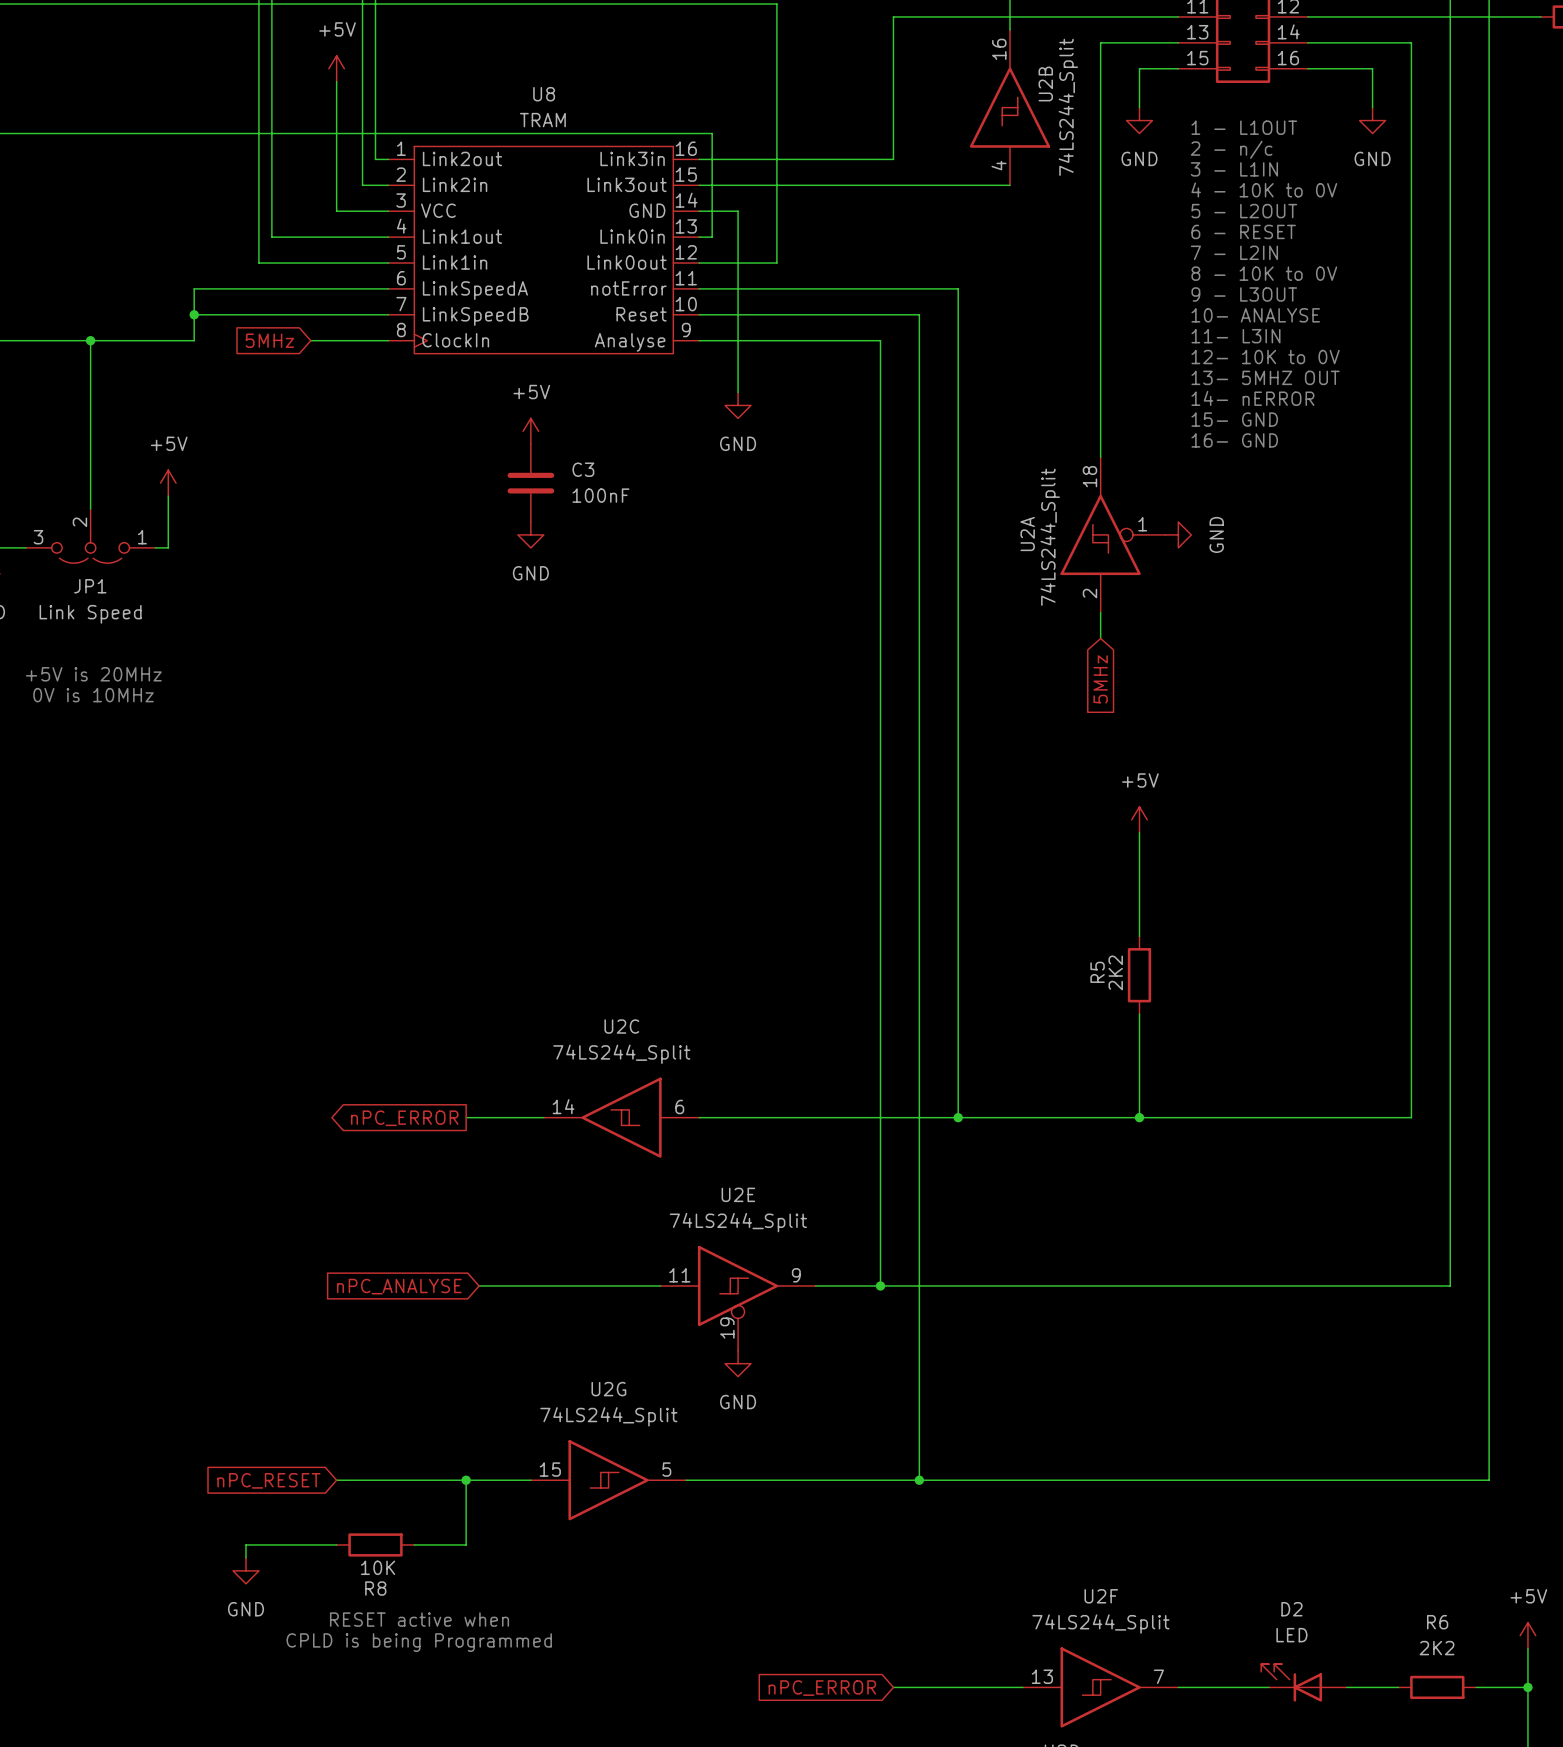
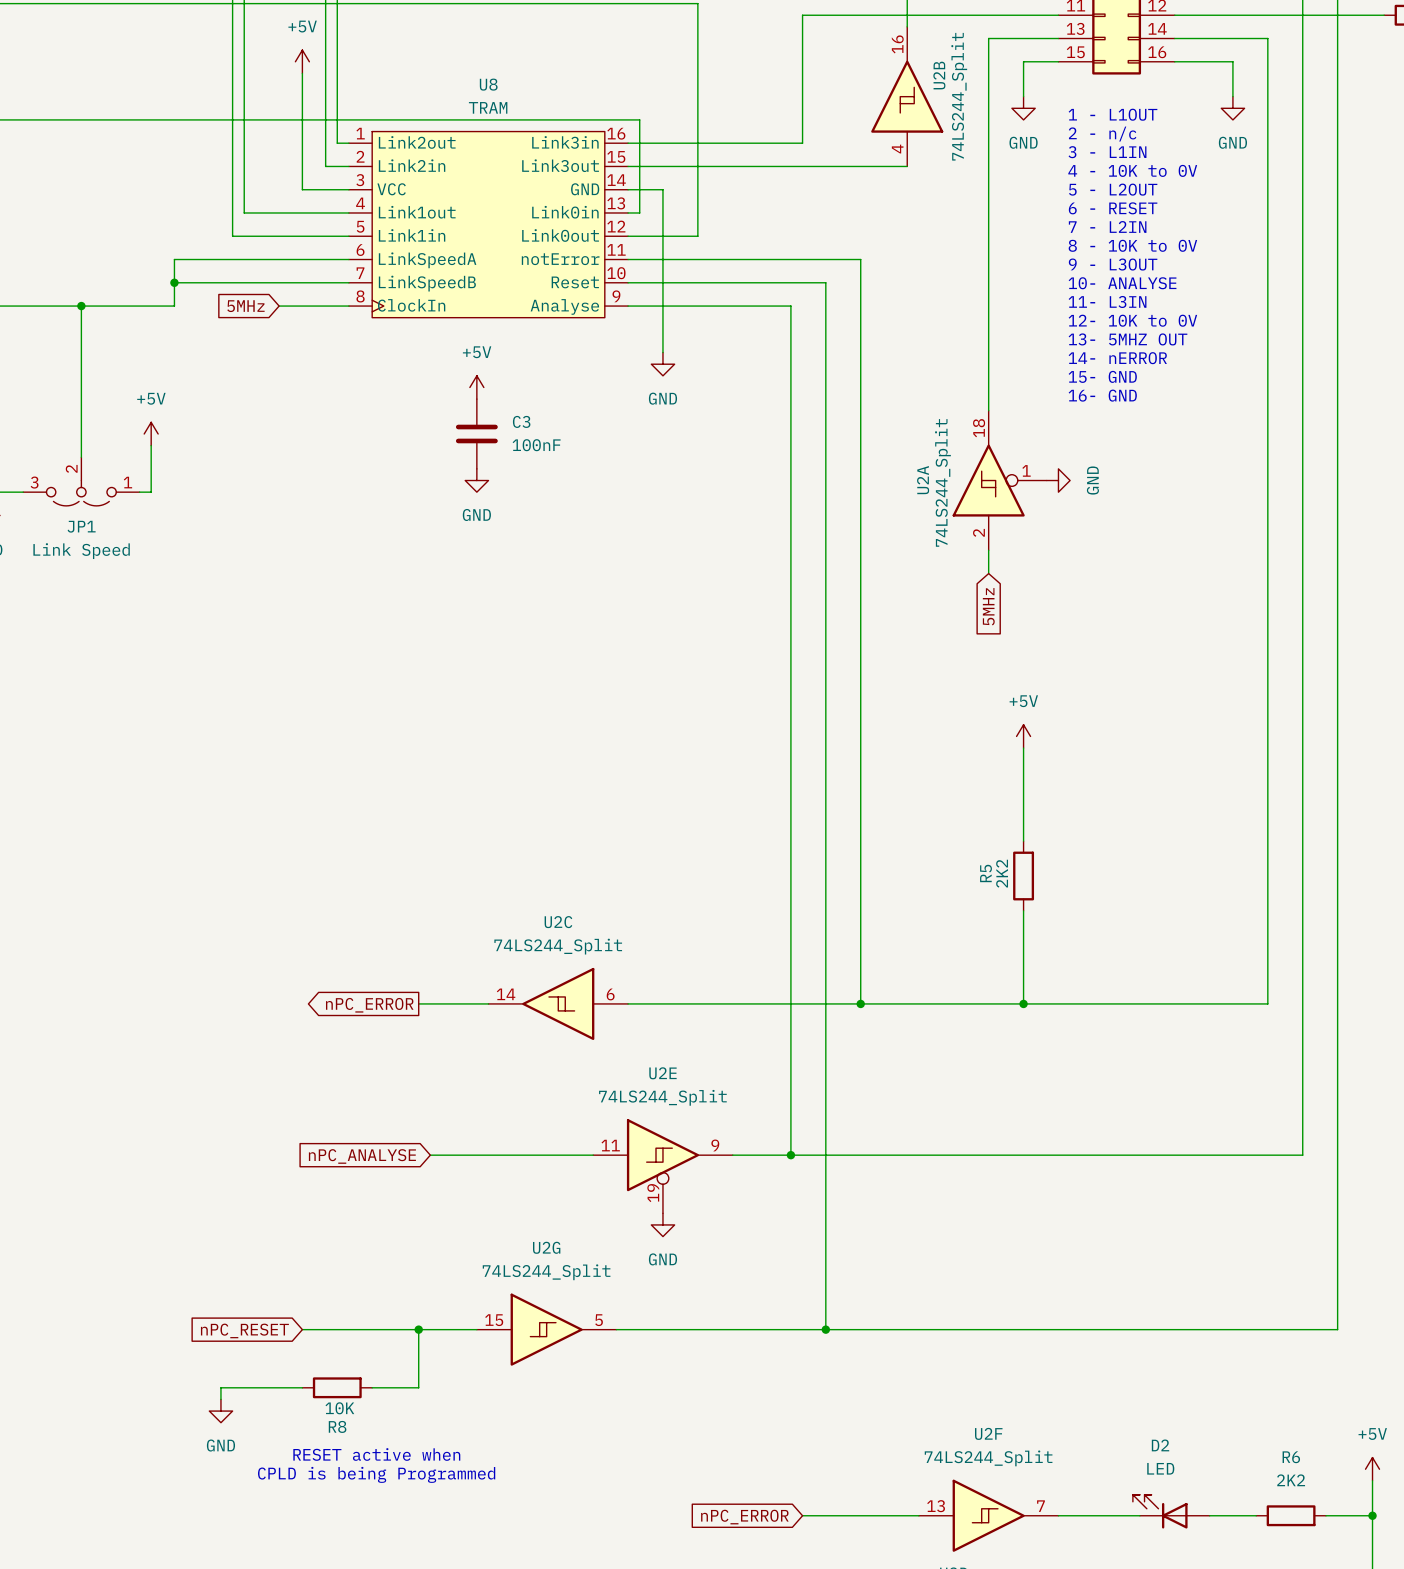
text: +5V is 20MHz (93, 674) -> none
text: 0V is 10MHz (93, 695) -> none

